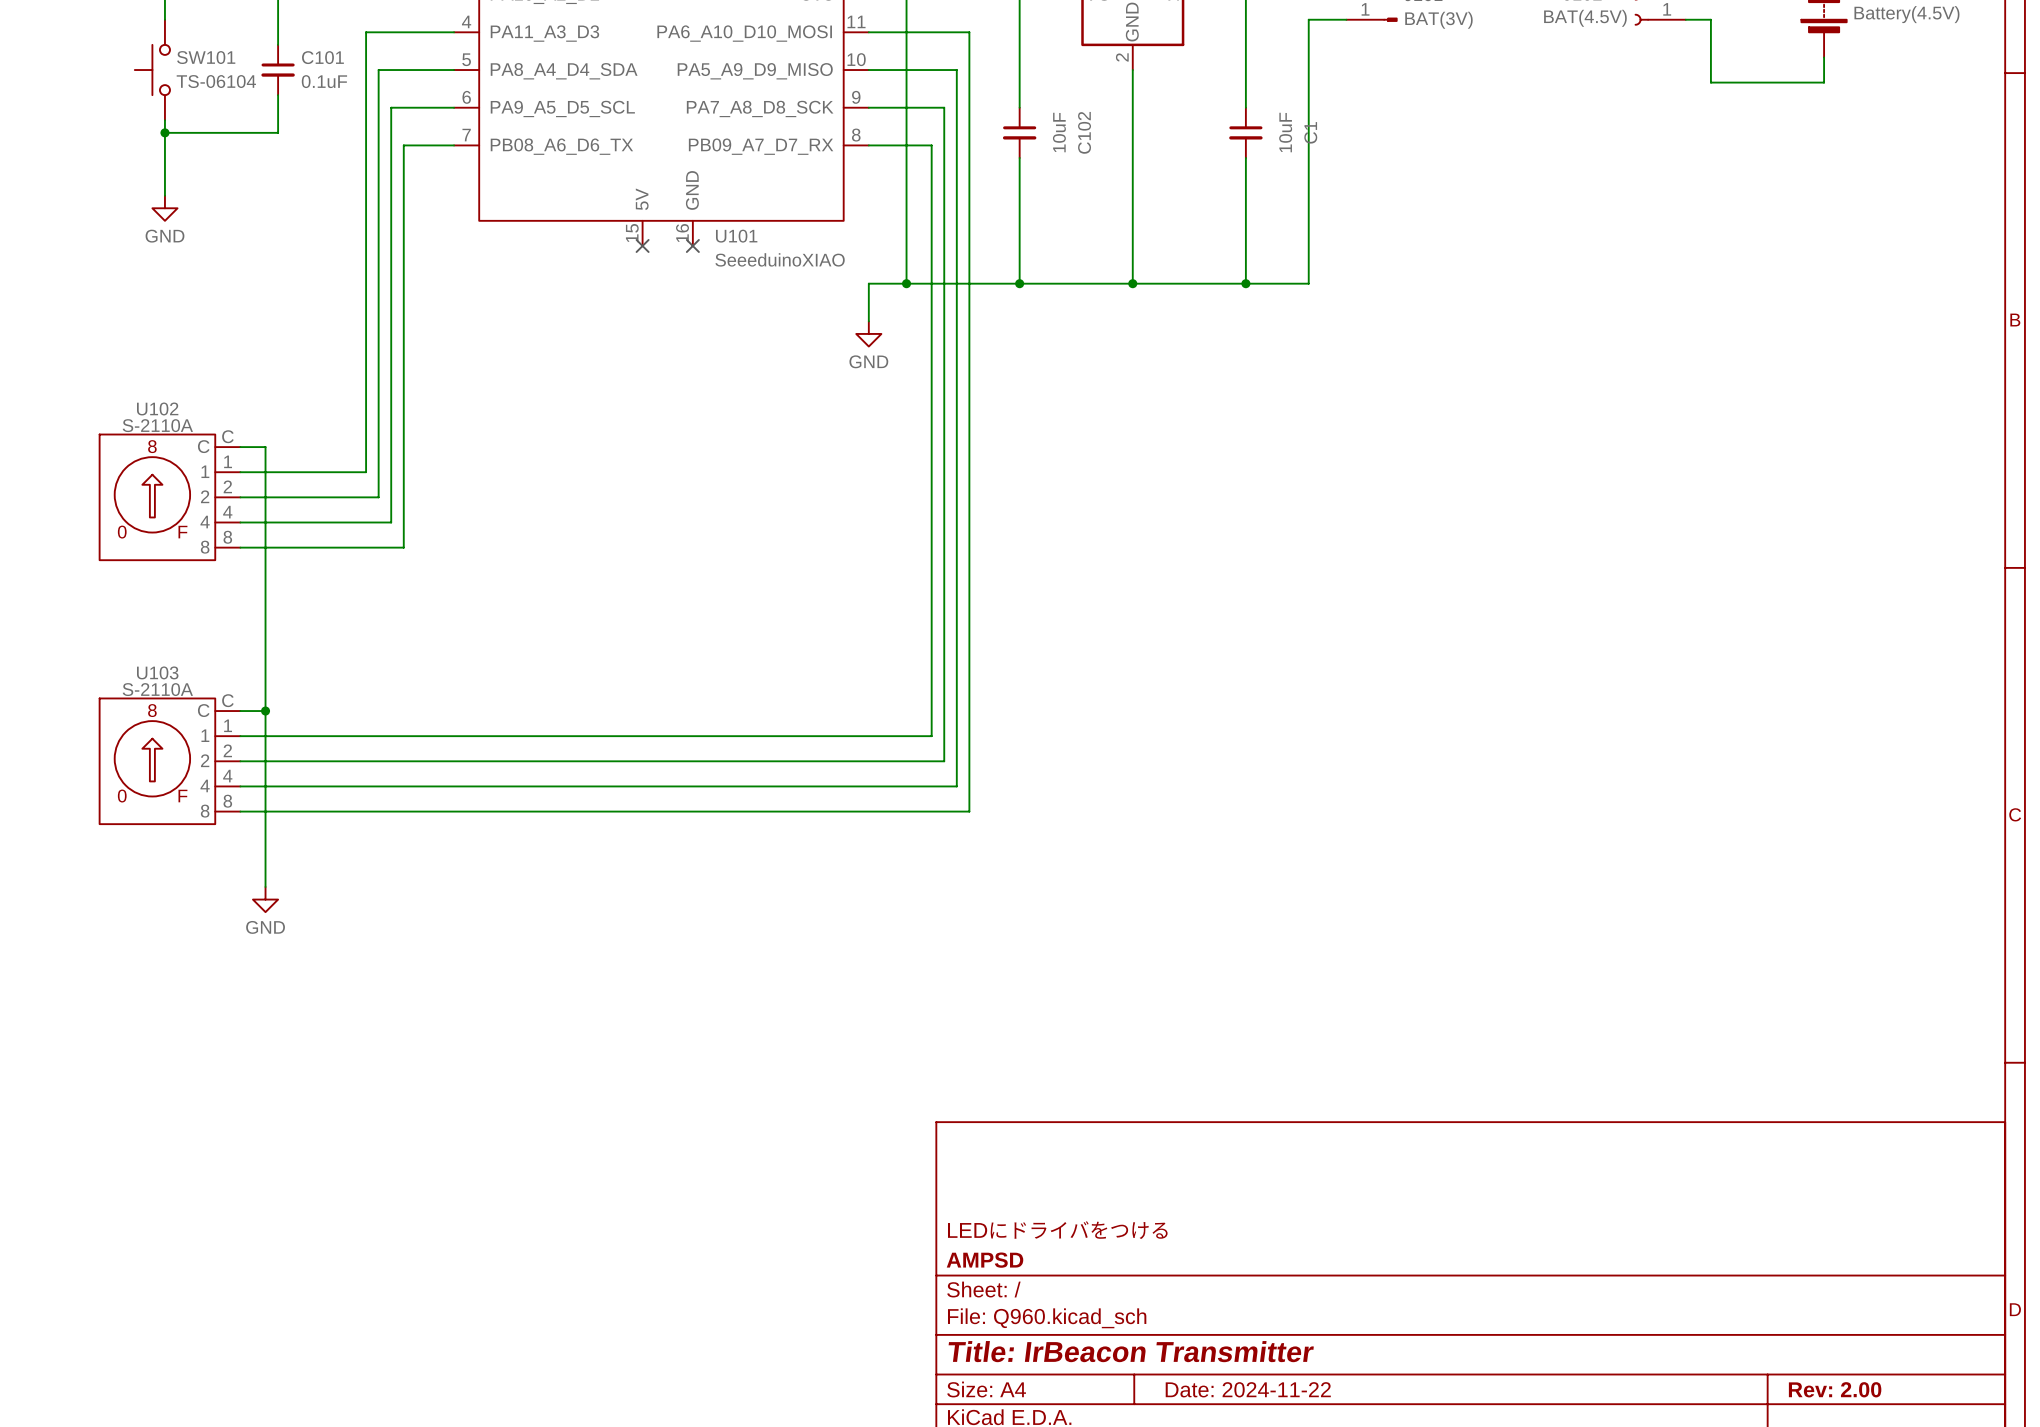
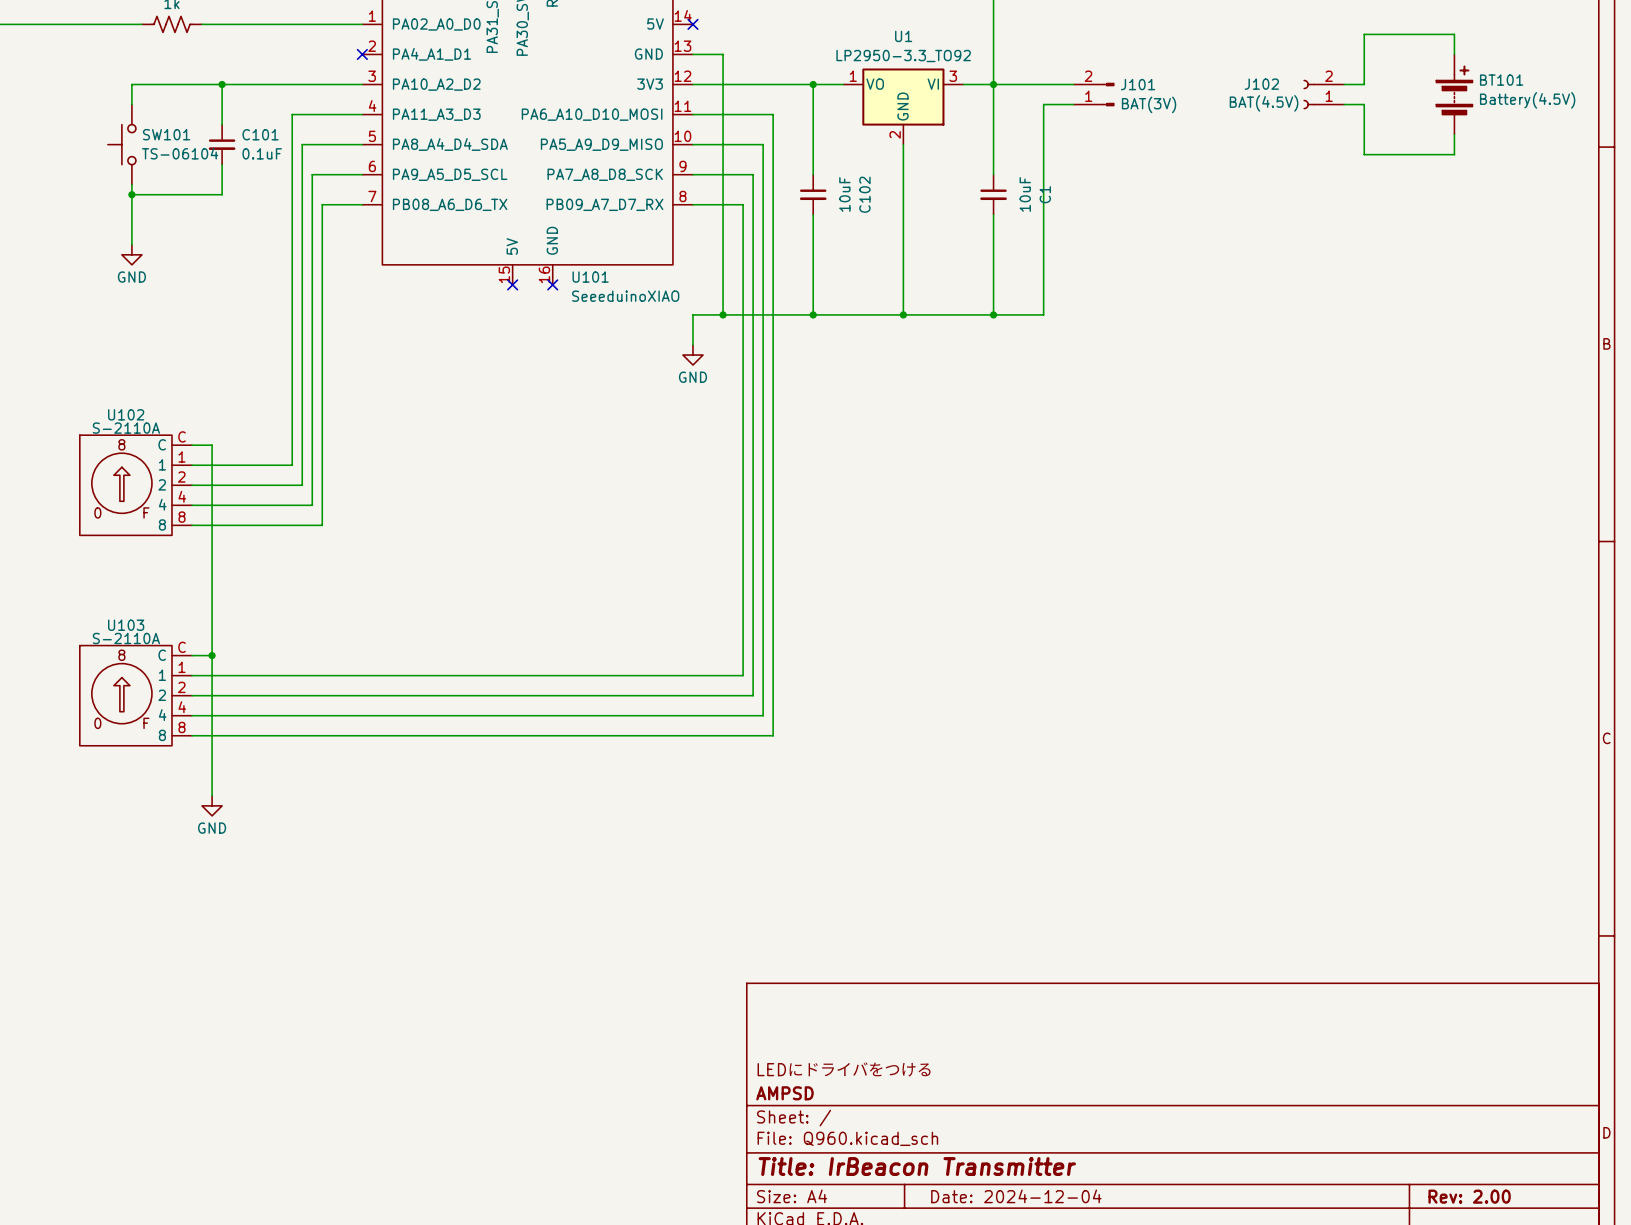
title block: Date: 2024-11-22 (1248, 1389) -> Date: 2024-12-04 (1016, 1196)

